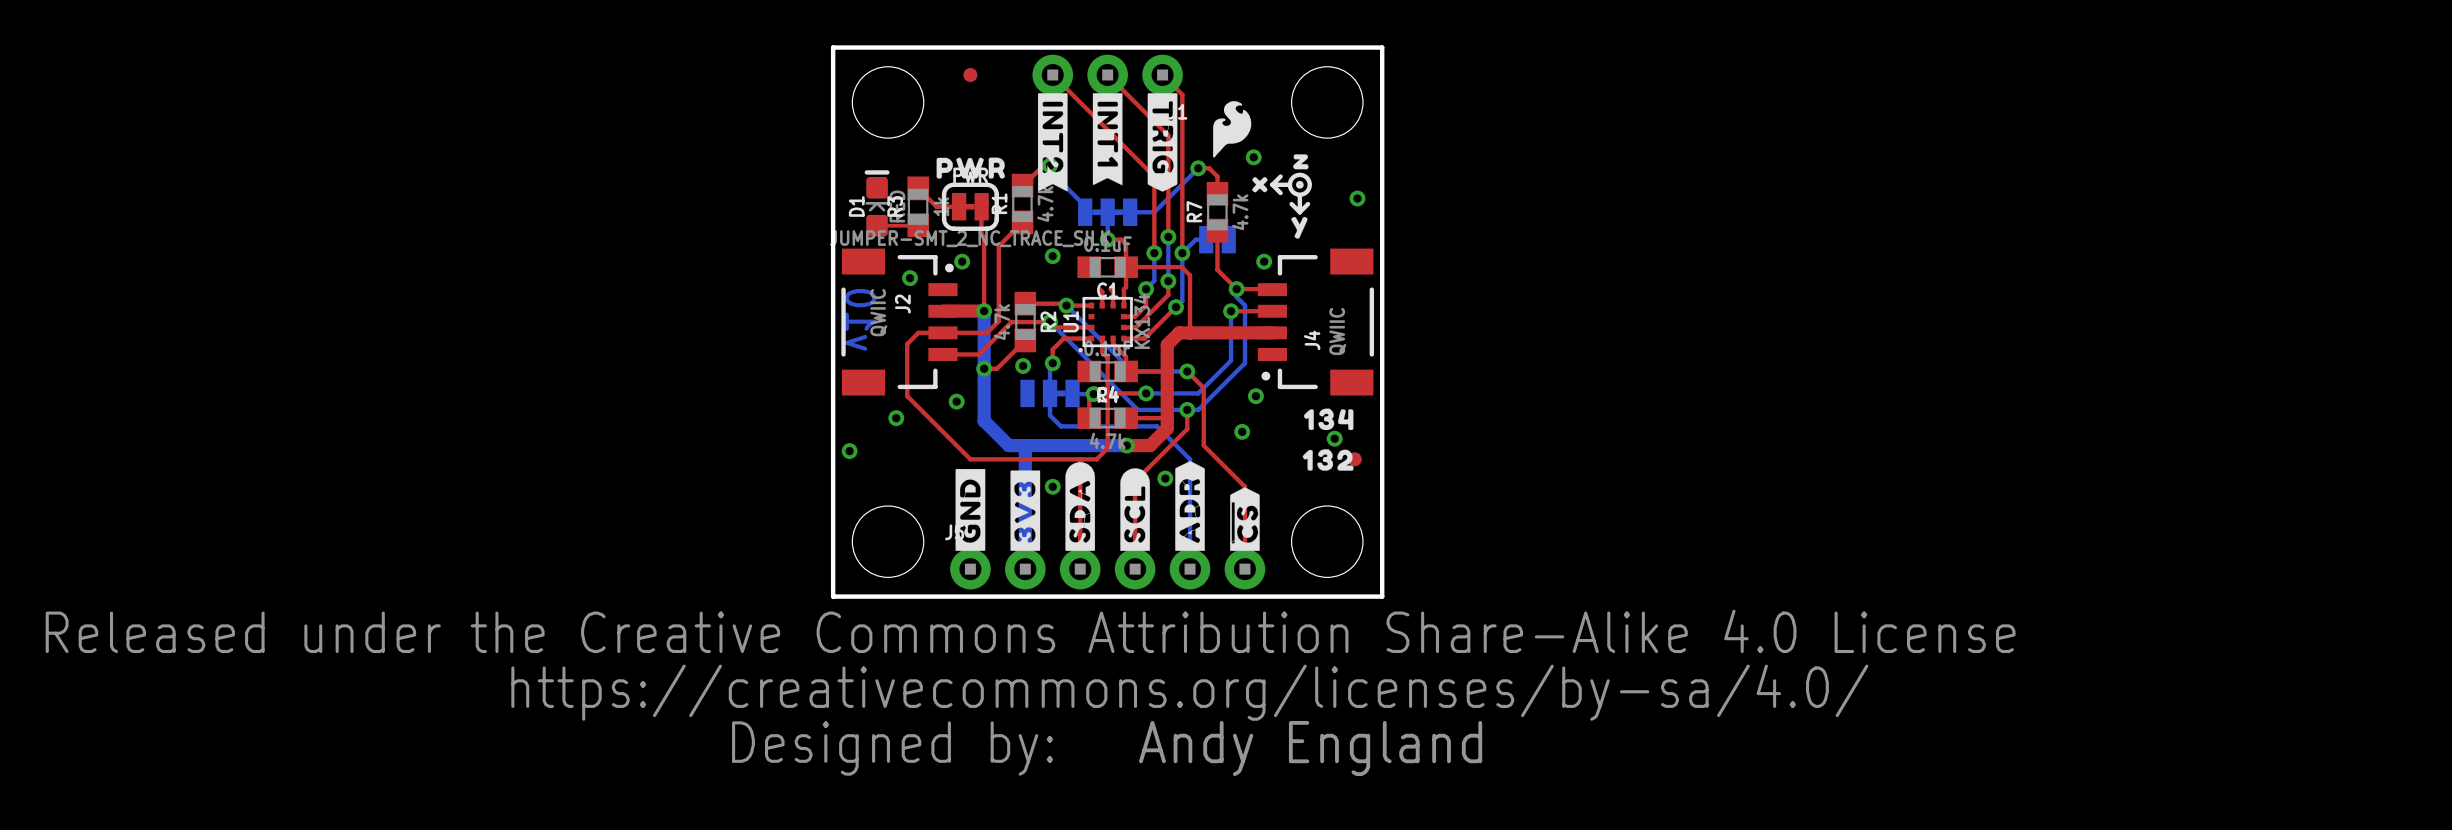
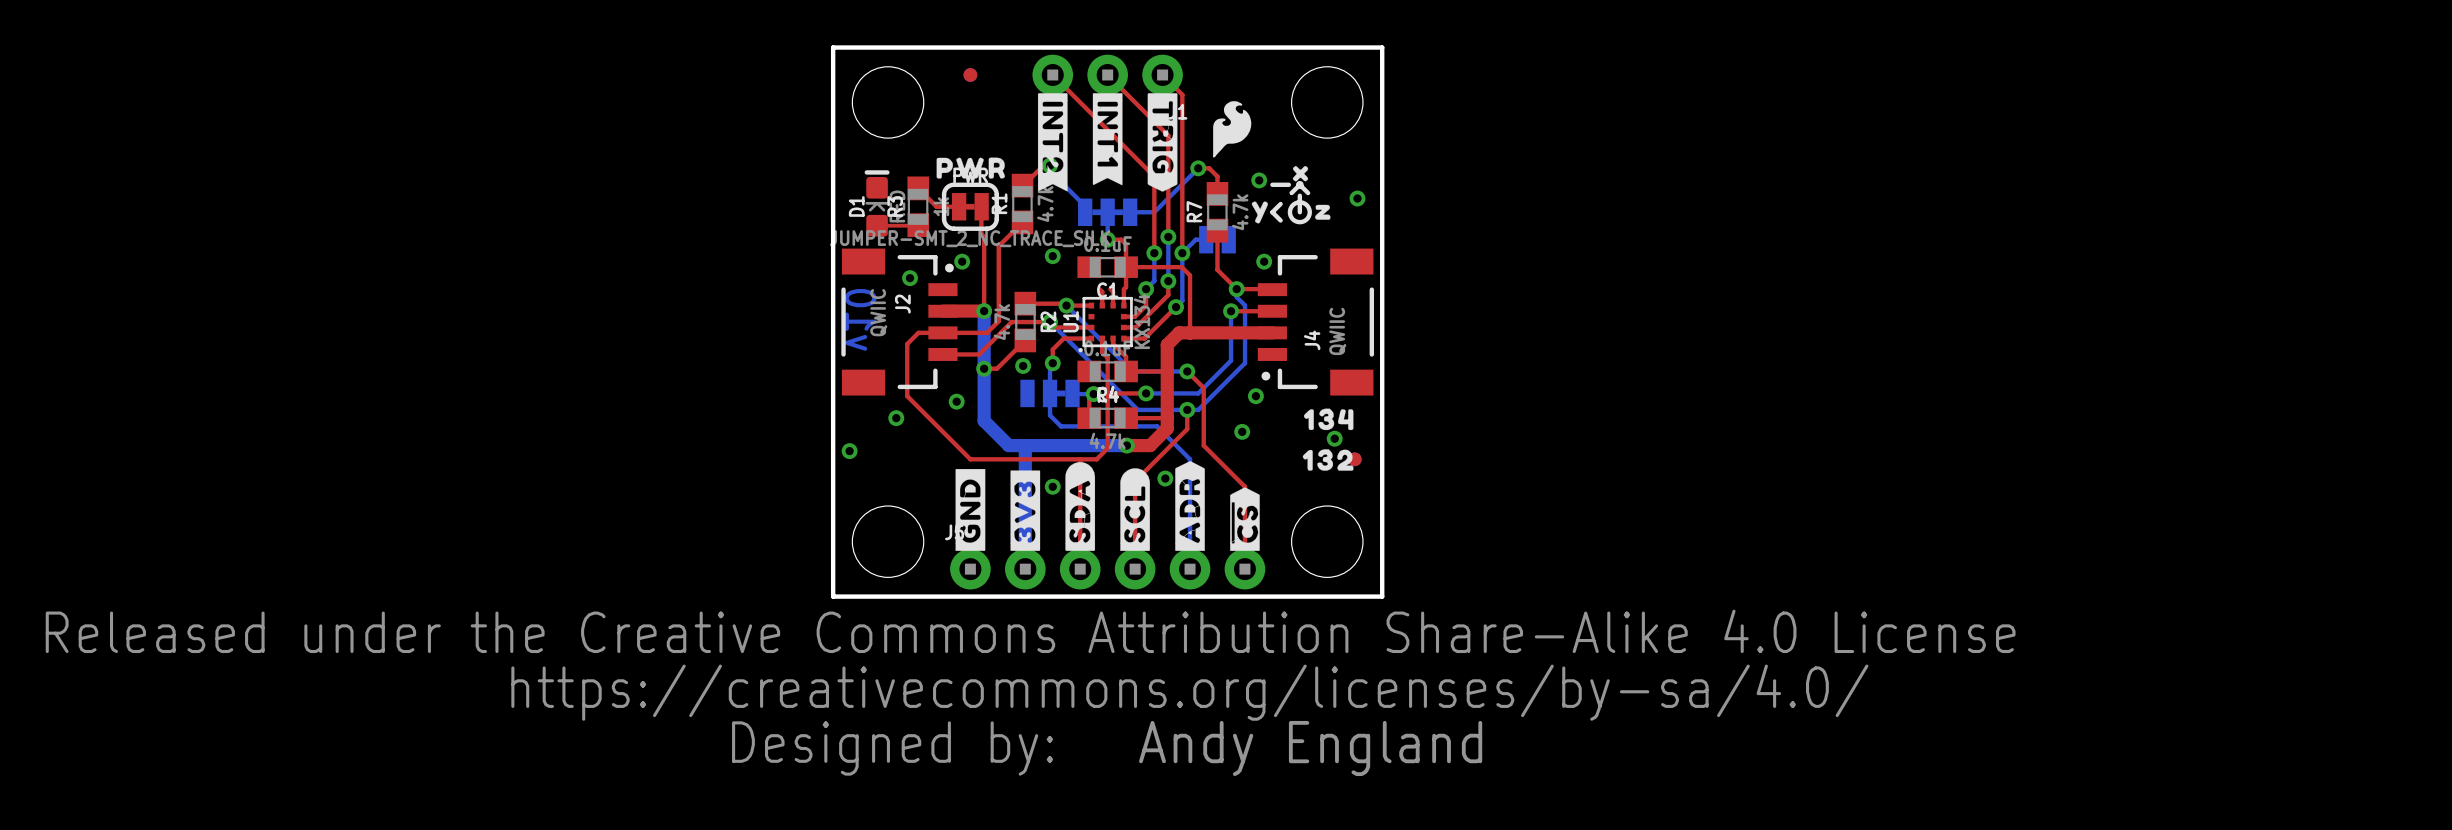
via position: (1253, 157) -> (1259, 180)
drawing position: (1300, 161) -> (1322, 212)
line: (1280, 176) (1272, 184) (1280, 193) -> (1280, 204) (1272, 212) (1280, 220)
drawing position: (1259, 184) -> (1300, 173)
drawing position: (1299, 184) -> (1299, 212)
line: none -> (1291, 193) (1299, 184) (1308, 193)
line: (1291, 204) (1299, 212) (1308, 204) -> none
drawing position: (1299, 227) -> (1259, 212)

